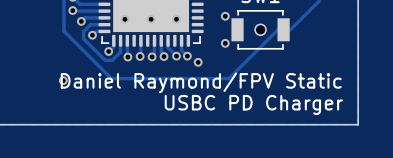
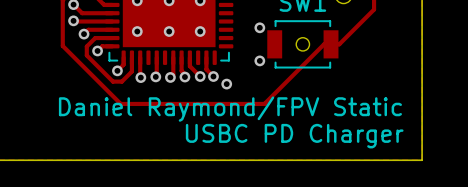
via: (63, 80) -> none

